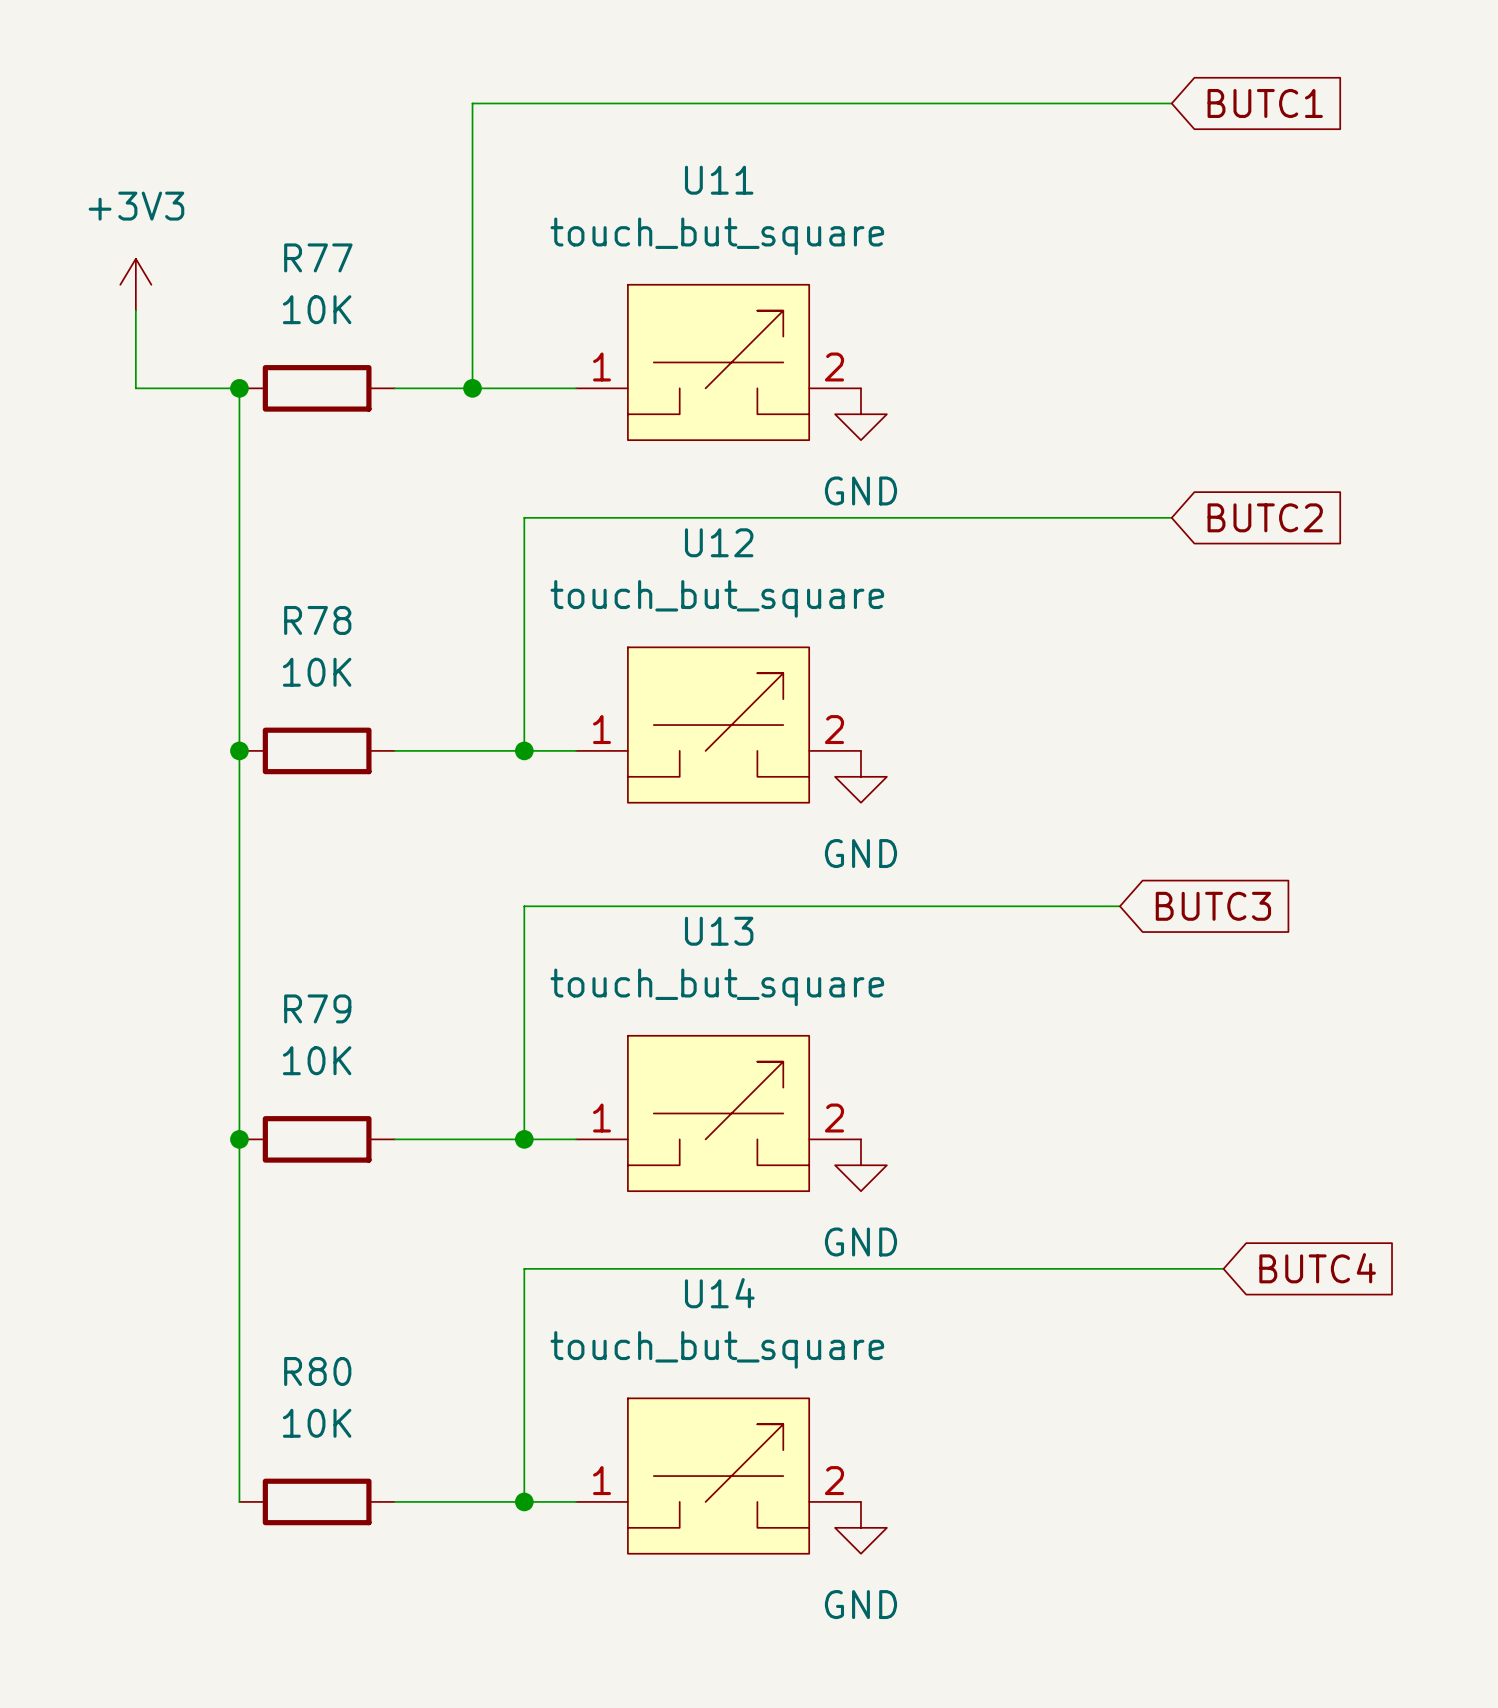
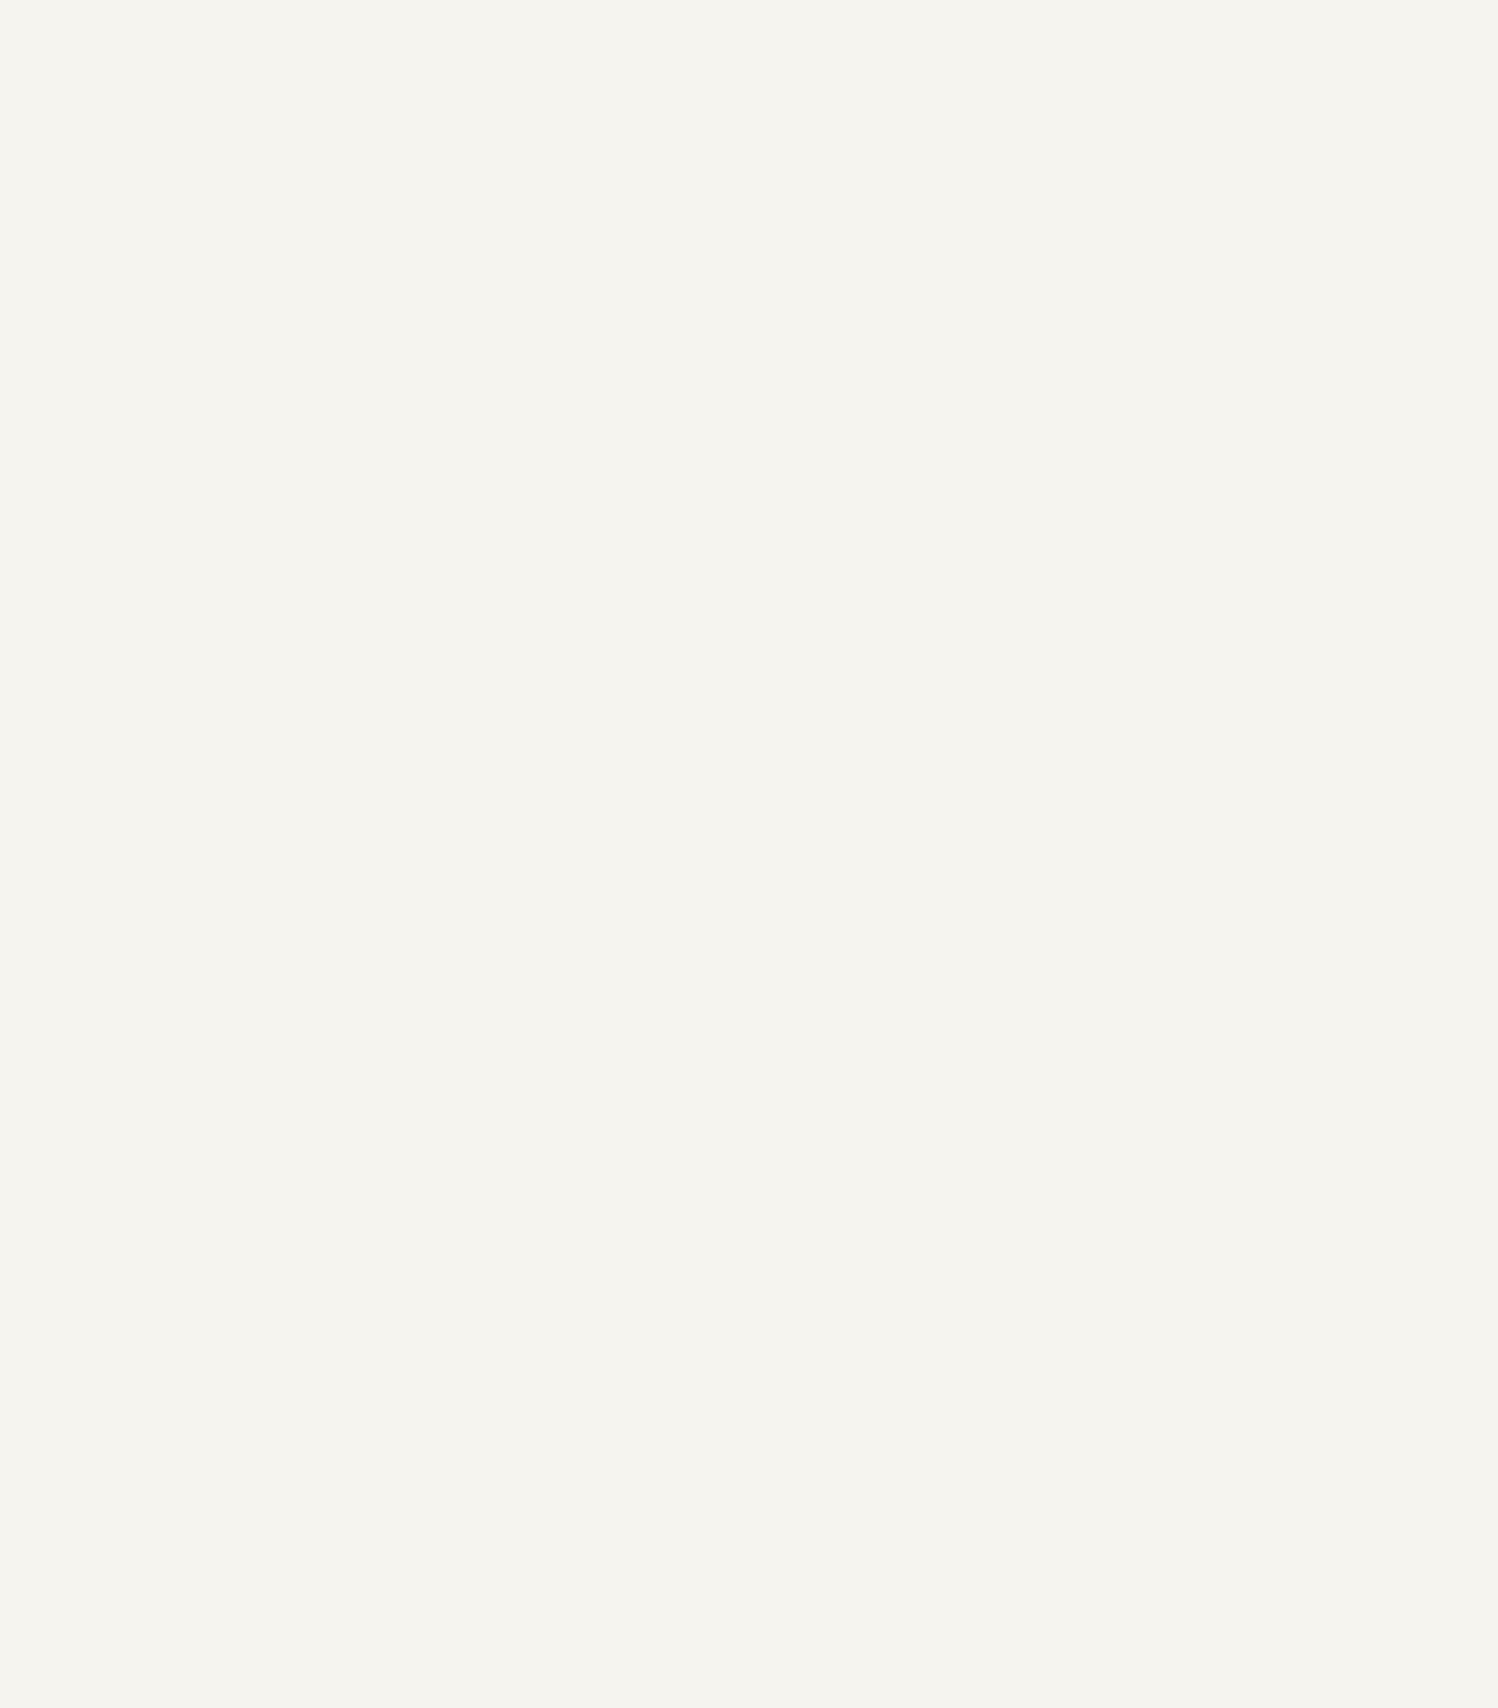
wire: (1171, 103) (472, 103) (472, 388) -> none
global label: BUTC1 (1265, 103) -> none
power symbol: +3V3 (135, 284) -> none
wire: (135, 310) (135, 388) (239, 388) (239, 1501) -> none
U11: touch_but_square (718, 362) -> none
junction: (239, 388) -> none
R77: 10K (317, 388) -> none
wire: (394, 388) (576, 388) -> none
junction: (472, 388) -> none
power symbol: GND (860, 414) -> none
wire: (1171, 517) (524, 517) (524, 750) -> none
global label: BUTC2 (1265, 517) -> none
U12: touch_but_square (718, 725) -> none
junction: (239, 750) -> none
R78: 10K (317, 750) -> none
wire: (394, 750) (576, 750) -> none
junction: (524, 750) -> none
power symbol: GND (860, 776) -> none
wire: (1119, 906) (524, 906) (524, 1139) -> none
global label: BUTC3 (1213, 906) -> none
U13: touch_but_square (718, 1113) -> none
junction: (239, 1139) -> none
R79: 10K (317, 1139) -> none
wire: (394, 1139) (576, 1139) -> none
junction: (524, 1139) -> none
power symbol: GND (860, 1165) -> none
wire: (1223, 1268) (524, 1268) (524, 1501) -> none
global label: BUTC4 (1317, 1268) -> none
U14: touch_but_square (718, 1476) -> none
R80: 10K (317, 1501) -> none
wire: (394, 1501) (576, 1501) -> none
junction: (524, 1501) -> none
power symbol: GND (860, 1527) -> none

